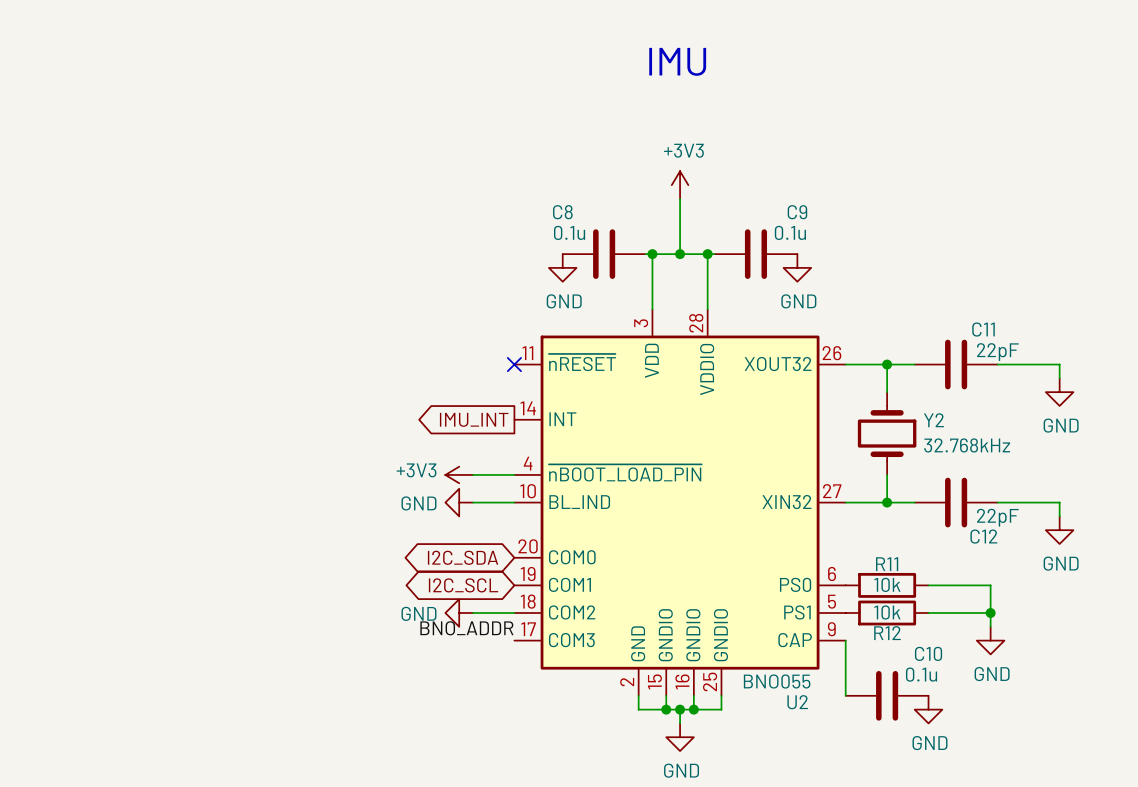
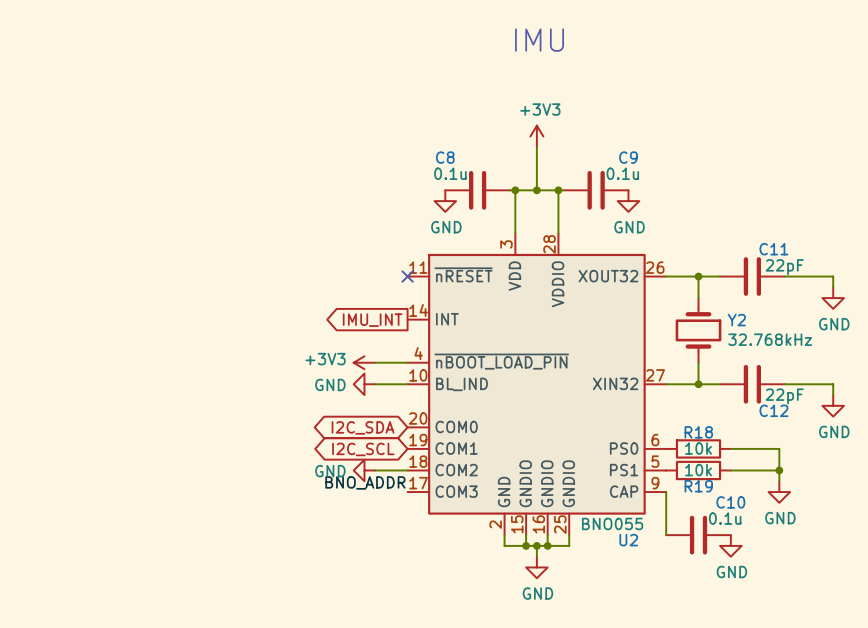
R11 name: R11 (887, 564) -> R18 (698, 432)
R12 name: R12 (887, 633) -> R19 (698, 486)

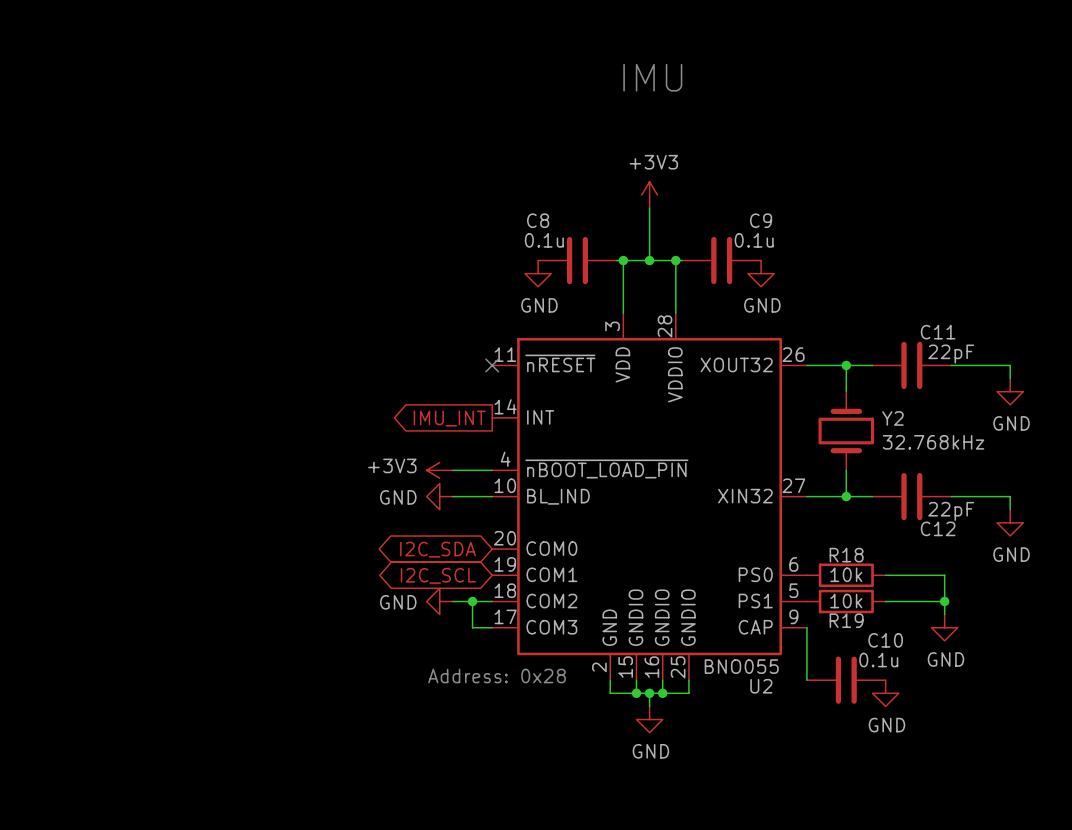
wire: none -> (472, 601) (472, 627) (492, 627)
junction: none -> (472, 601)
label: BNO_ADDR (365, 482) -> none
text: none -> Address: 0x28 (497, 676)

